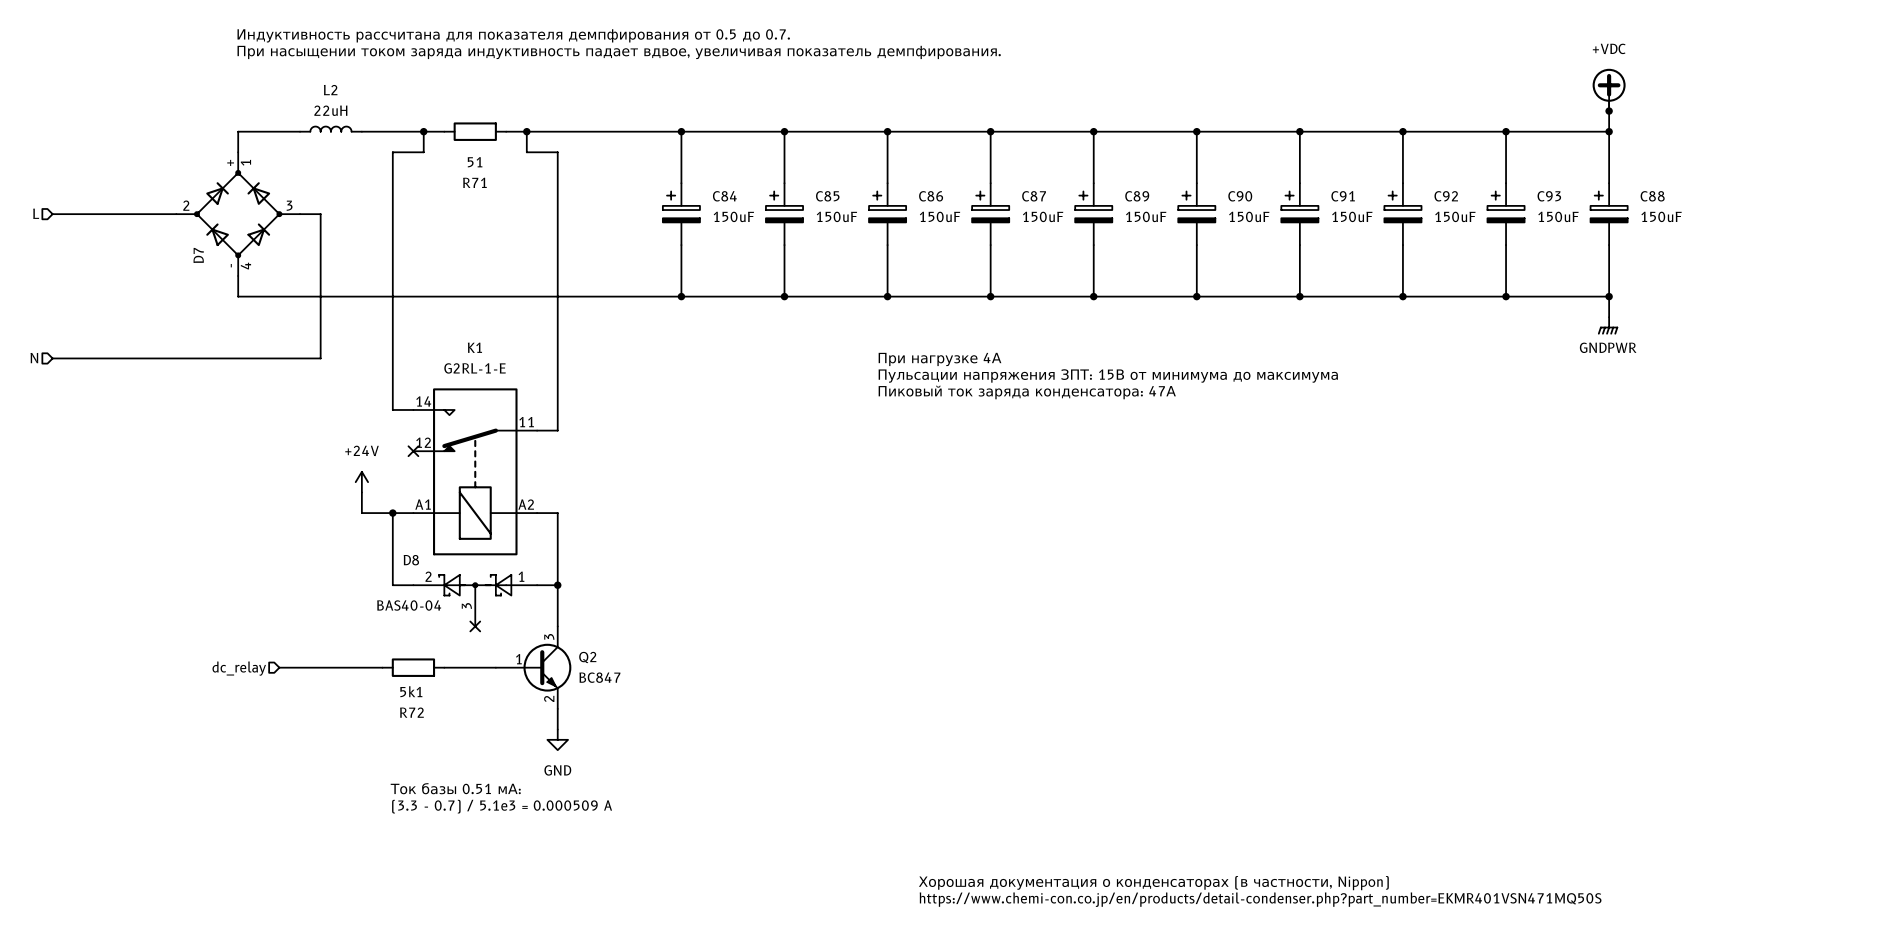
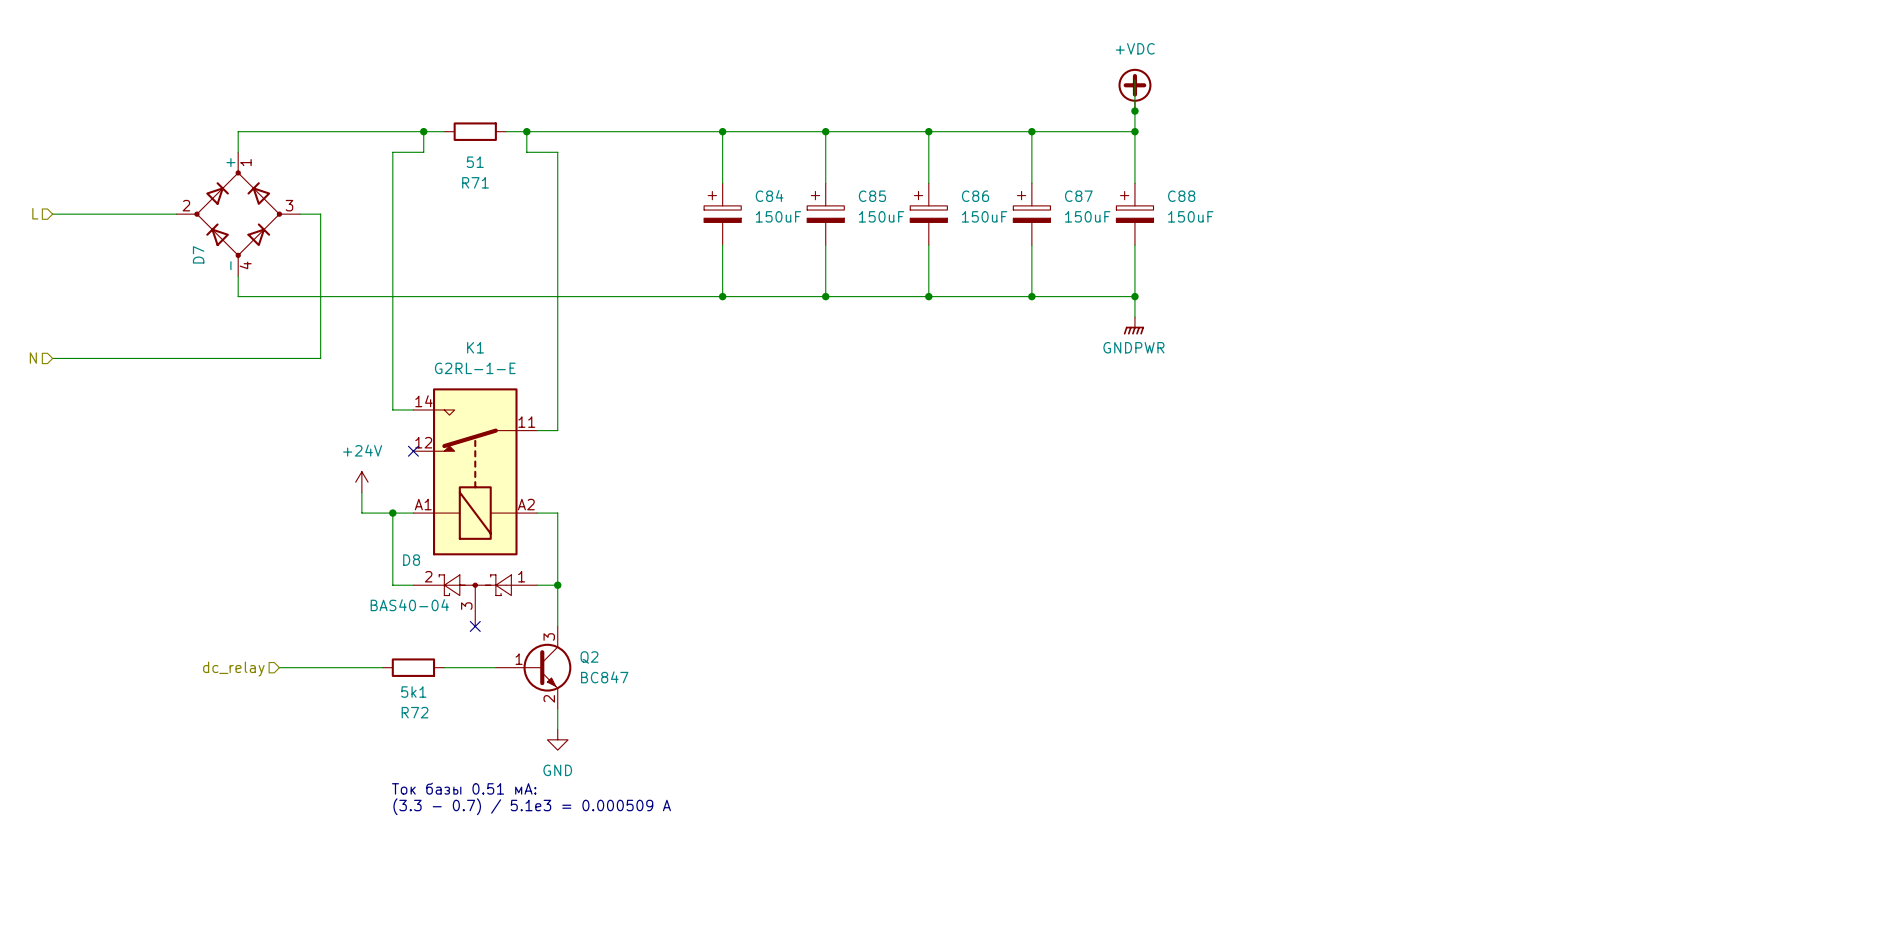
text: Индуктивность рассчитана для показателя демпфирования от 0.5 до 0.7. (513, 35) -> none
text: При насыщении током заряда индуктивность падает вдвое, увеличивая показатель демпфирования. (619, 52) -> none
wire: none -> (1134, 80) (1134, 183)
wire: (1609, 80) (1609, 183) -> none
power symbol: none -> +VDC (1134, 89)
power symbol: +VDC (1609, 89) -> none
junction: none -> (1134, 111)
junction: (1609, 111) -> none
L2: 22uH (330, 129) -> none
wire: none -> (300, 131) (361, 131)
wire: (681, 131) (681, 183) -> (722, 131) (722, 183)
junction: (681, 131) -> none
junction: none -> (722, 131)
wire: (784, 131) (784, 183) -> (825, 131) (825, 183)
junction: (784, 131) -> none
junction: none -> (825, 131)
wire: (887, 131) (887, 183) -> (928, 131) (928, 183)
junction: (887, 131) -> none
junction: none -> (928, 131)
wire: (990, 131) (990, 183) -> (1031, 131) (1031, 183)
junction: (990, 131) -> none
junction: none -> (1031, 131)
wire: (1093, 131) (1093, 183) -> none
junction: (1093, 131) -> none
wire: (1134, 131) (1609, 131) -> none
junction: none -> (1134, 131)
wire: (1196, 131) (1196, 183) -> none
junction: (1196, 131) -> none
wire: (1299, 131) (1299, 183) -> none
junction: (1299, 131) -> none
wire: (1402, 131) (1402, 183) -> none
junction: (1402, 131) -> none
wire: (1506, 131) (1506, 183) -> none
junction: (1506, 131) -> none
junction: (1609, 131) -> none
C84 position: (681, 214) -> (722, 214)
C85 position: (784, 214) -> (825, 214)
C86 position: (887, 214) -> (928, 214)
C87 position: (990, 214) -> (1031, 214)
C89: 150uF (1093, 214) -> none
C90: 150uF (1196, 214) -> none
C91: 150uF (1299, 214) -> none
C92: 150uF (1402, 214) -> none
C93: 150uF (1506, 214) -> none
C88 position: (1609, 214) -> (1134, 214)
wire: (681, 245) (681, 296) -> (722, 245) (722, 296)
wire: (784, 245) (784, 296) -> (825, 245) (825, 296)
wire: (887, 245) (887, 296) -> (928, 245) (928, 296)
wire: (990, 245) (990, 296) -> (1031, 245) (1031, 296)
wire: (1093, 245) (1093, 296) -> none
wire: none -> (1134, 245) (1134, 317)
wire: (1196, 245) (1196, 296) -> none
wire: (1299, 245) (1299, 296) -> none
wire: (1402, 245) (1402, 296) -> none
wire: (1506, 245) (1506, 296) -> none
wire: (1609, 245) (1609, 317) -> none
junction: (681, 296) -> none
junction: none -> (722, 296)
junction: (784, 296) -> none
junction: none -> (825, 296)
junction: (887, 296) -> none
junction: none -> (928, 296)
junction: (990, 296) -> none
junction: none -> (1031, 296)
junction: (1093, 296) -> none
wire: (1134, 296) (1609, 296) -> none
junction: none -> (1134, 296)
junction: (1196, 296) -> none
junction: (1299, 296) -> none
junction: (1402, 296) -> none
junction: (1506, 296) -> none
junction: (1609, 296) -> none
power symbol: none -> GNDPWR (1133, 325)
power symbol: GNDPWR (1608, 325) -> none
text: При нагрузке 4А (940, 359) -> none
text: Пульсации напряжения ЗПТ: 15В от минимума до максимума (1108, 375) -> none
text: Пиковый ток заряда конденсатора: 47А (1027, 392) -> none
text: Хорошая документация о конденсаторах (в частности, Nippon) (1153, 883) -> none
text: https://www.chemi-con.co.jp/en/products/detail-condenser.php?part_number=EKMR401VSN471MQ50S (1260, 899) -> none

